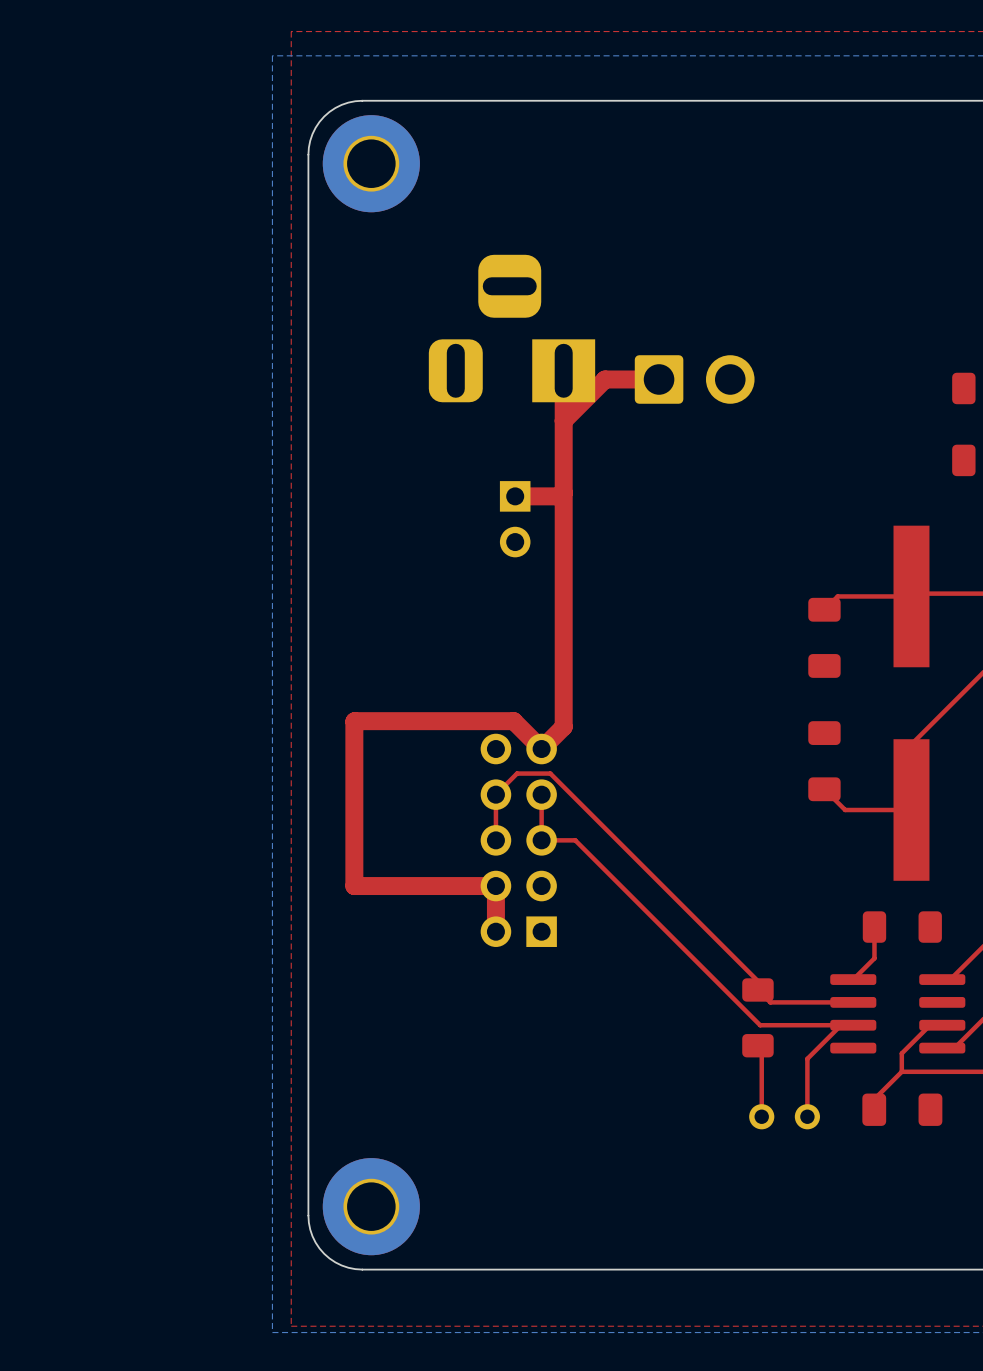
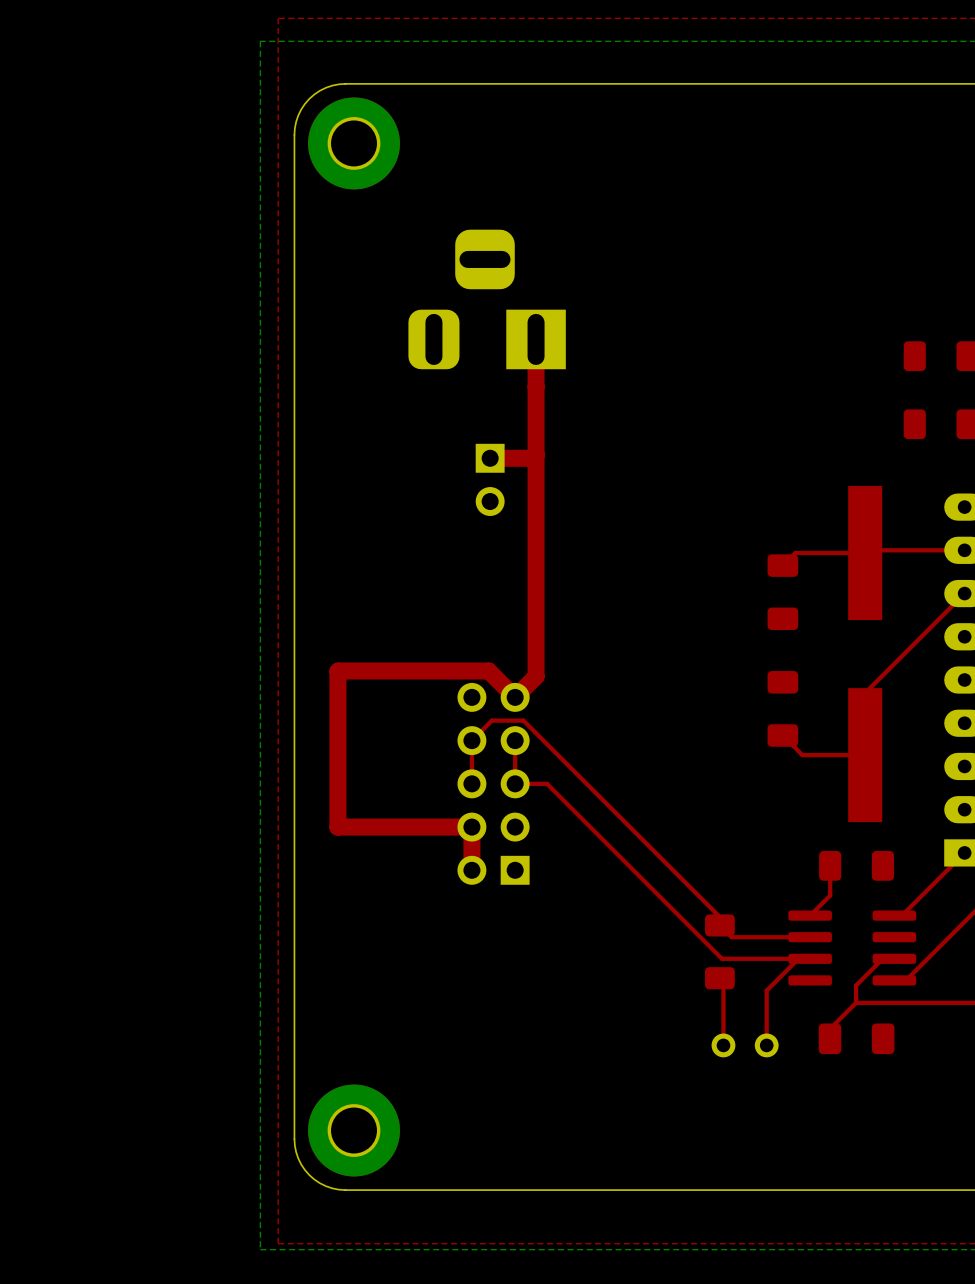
top track: (659, 379) (605, 379) (563, 420) -> none
part: (694, 379) -> none

